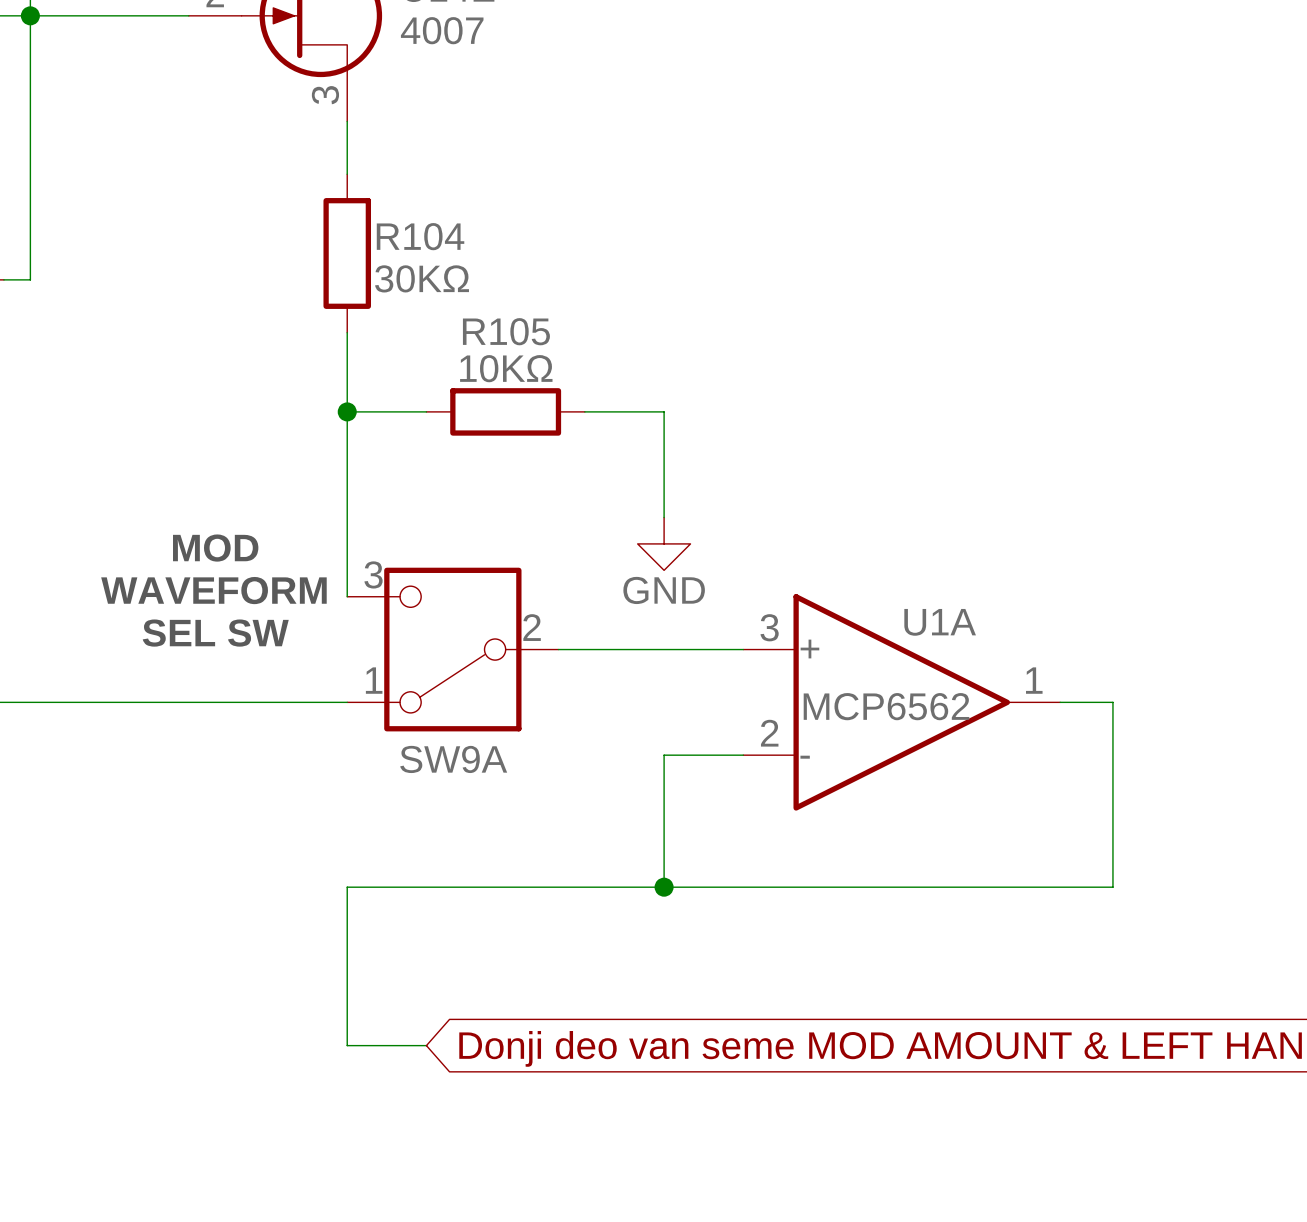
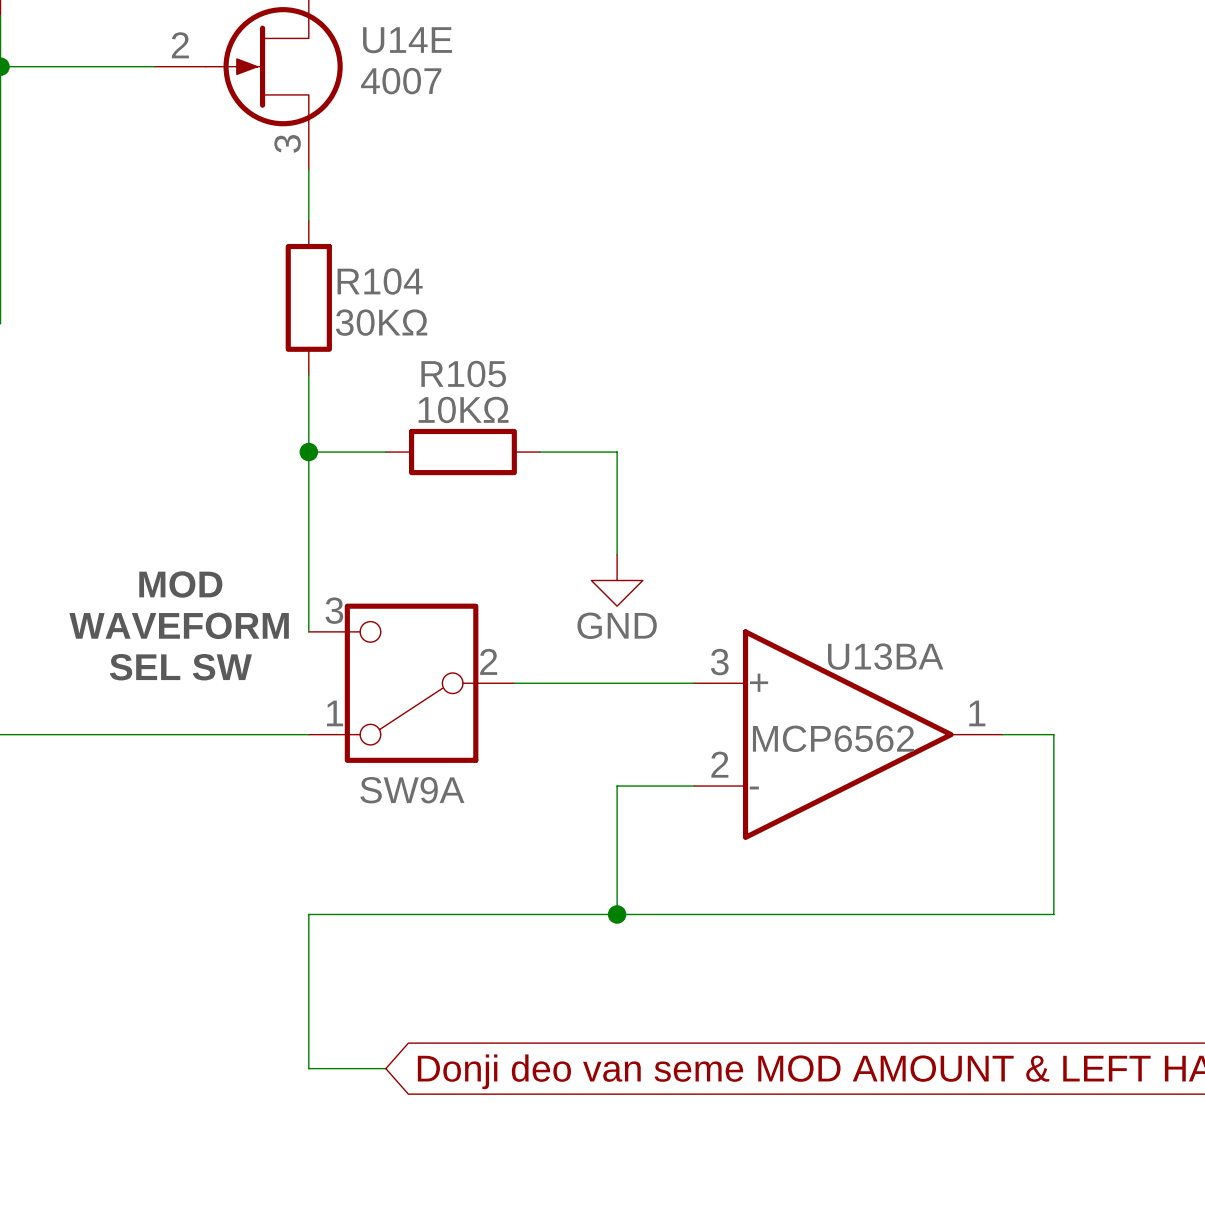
U1A name: U1A (940, 622) -> U13BA (885, 656)

